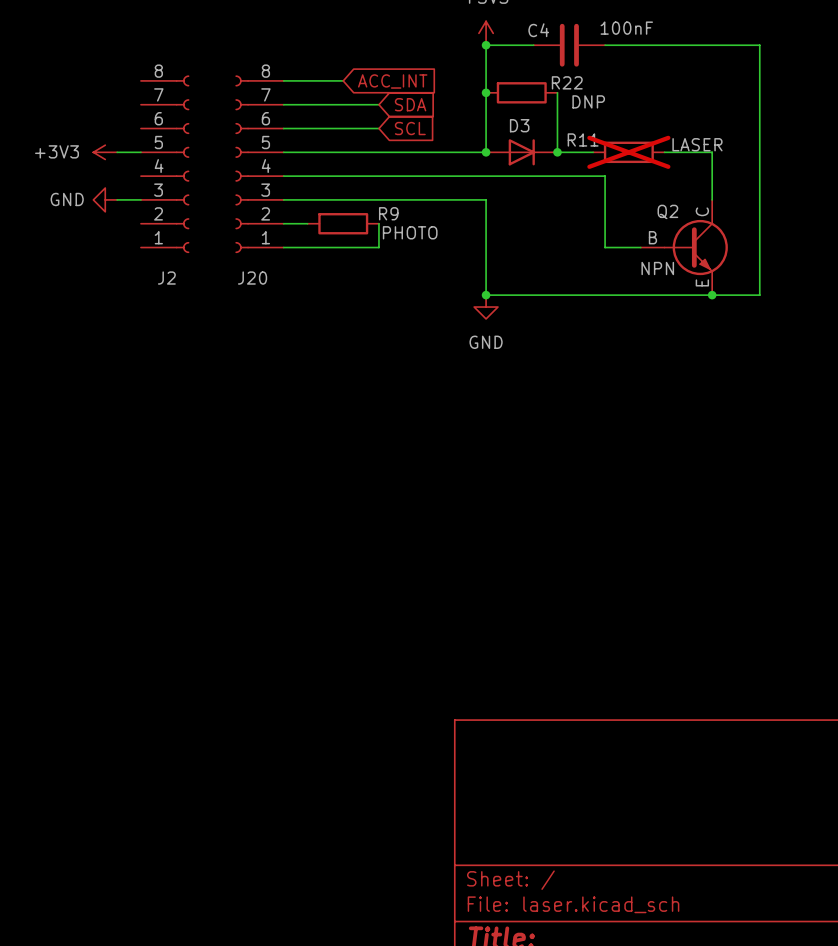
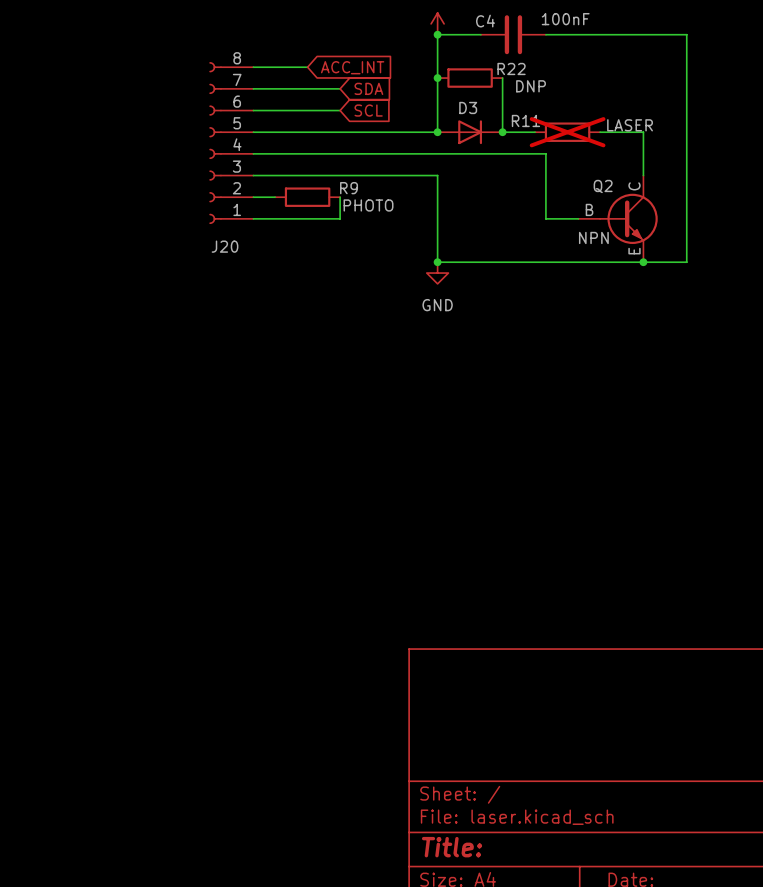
power symbol: +3V3 (105, 152) -> none
wire: (117, 152) (140, 152) -> none
J2: (165, 164) -> none
power symbol: GND (105, 199) -> none
wire: (117, 199) (140, 199) -> none

